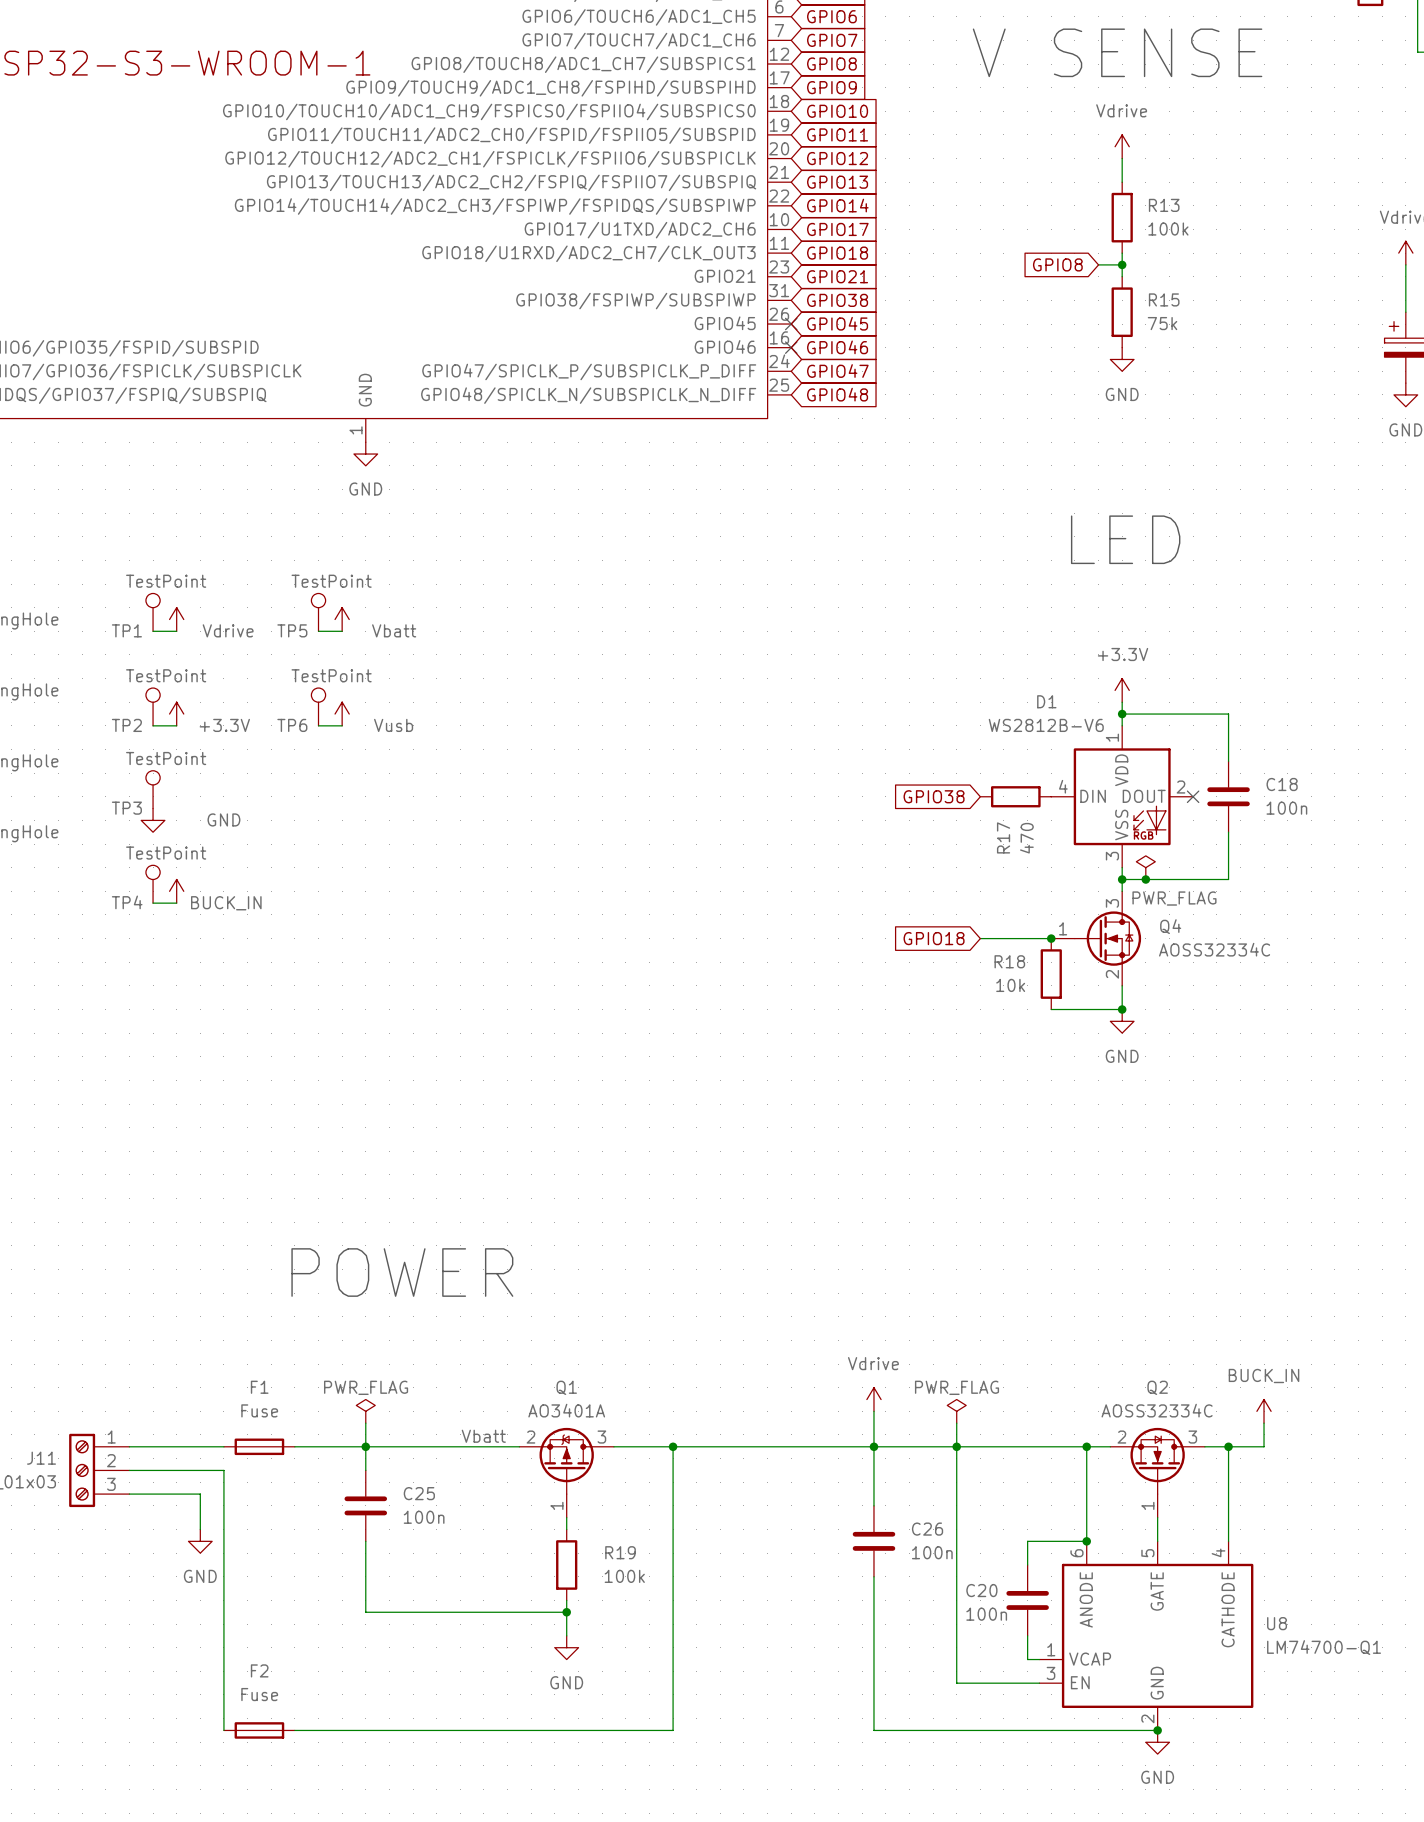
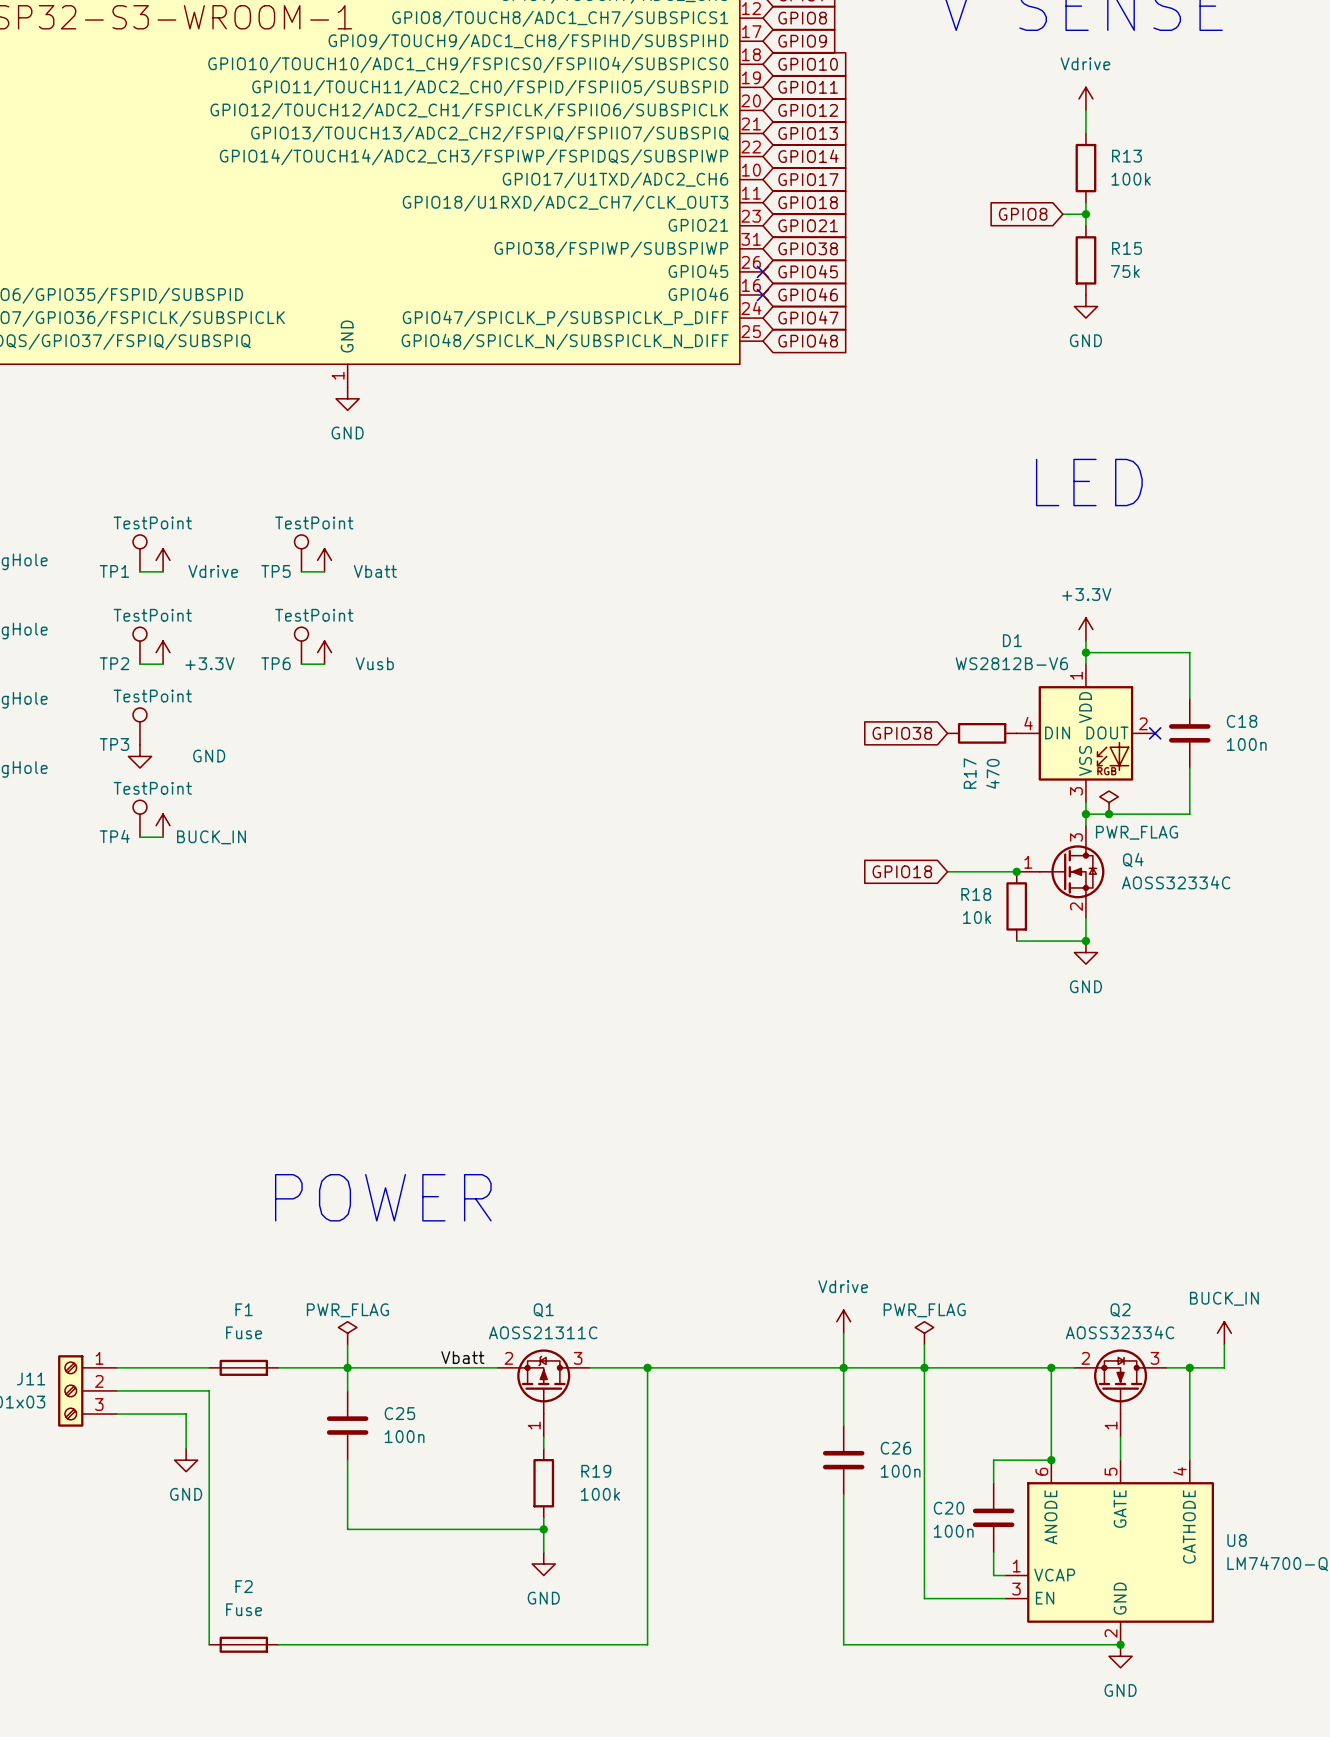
Q1 value: AO3401A (566, 1410) -> AOSS21311C (543, 1332)

